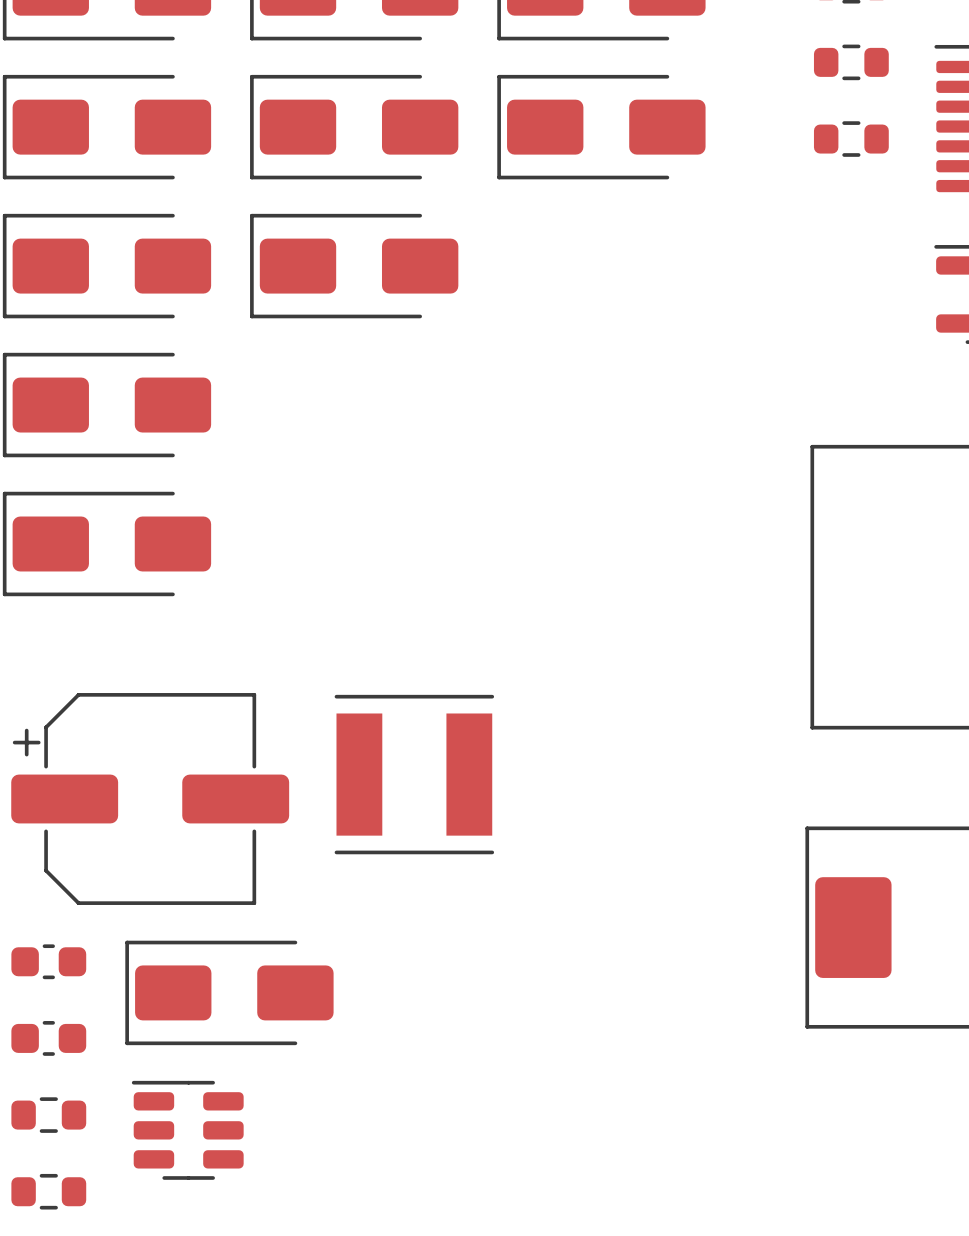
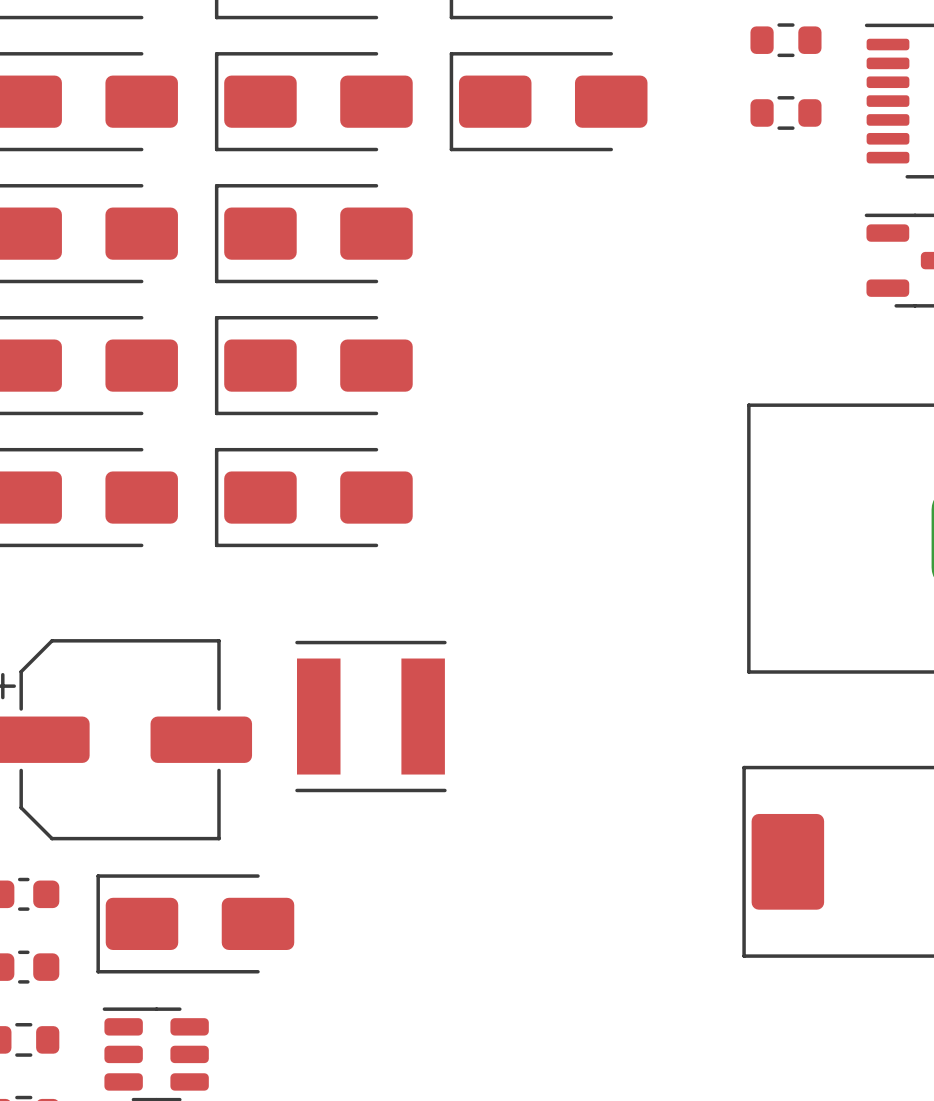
part: none -> (313, 365)
part: none -> (313, 497)

